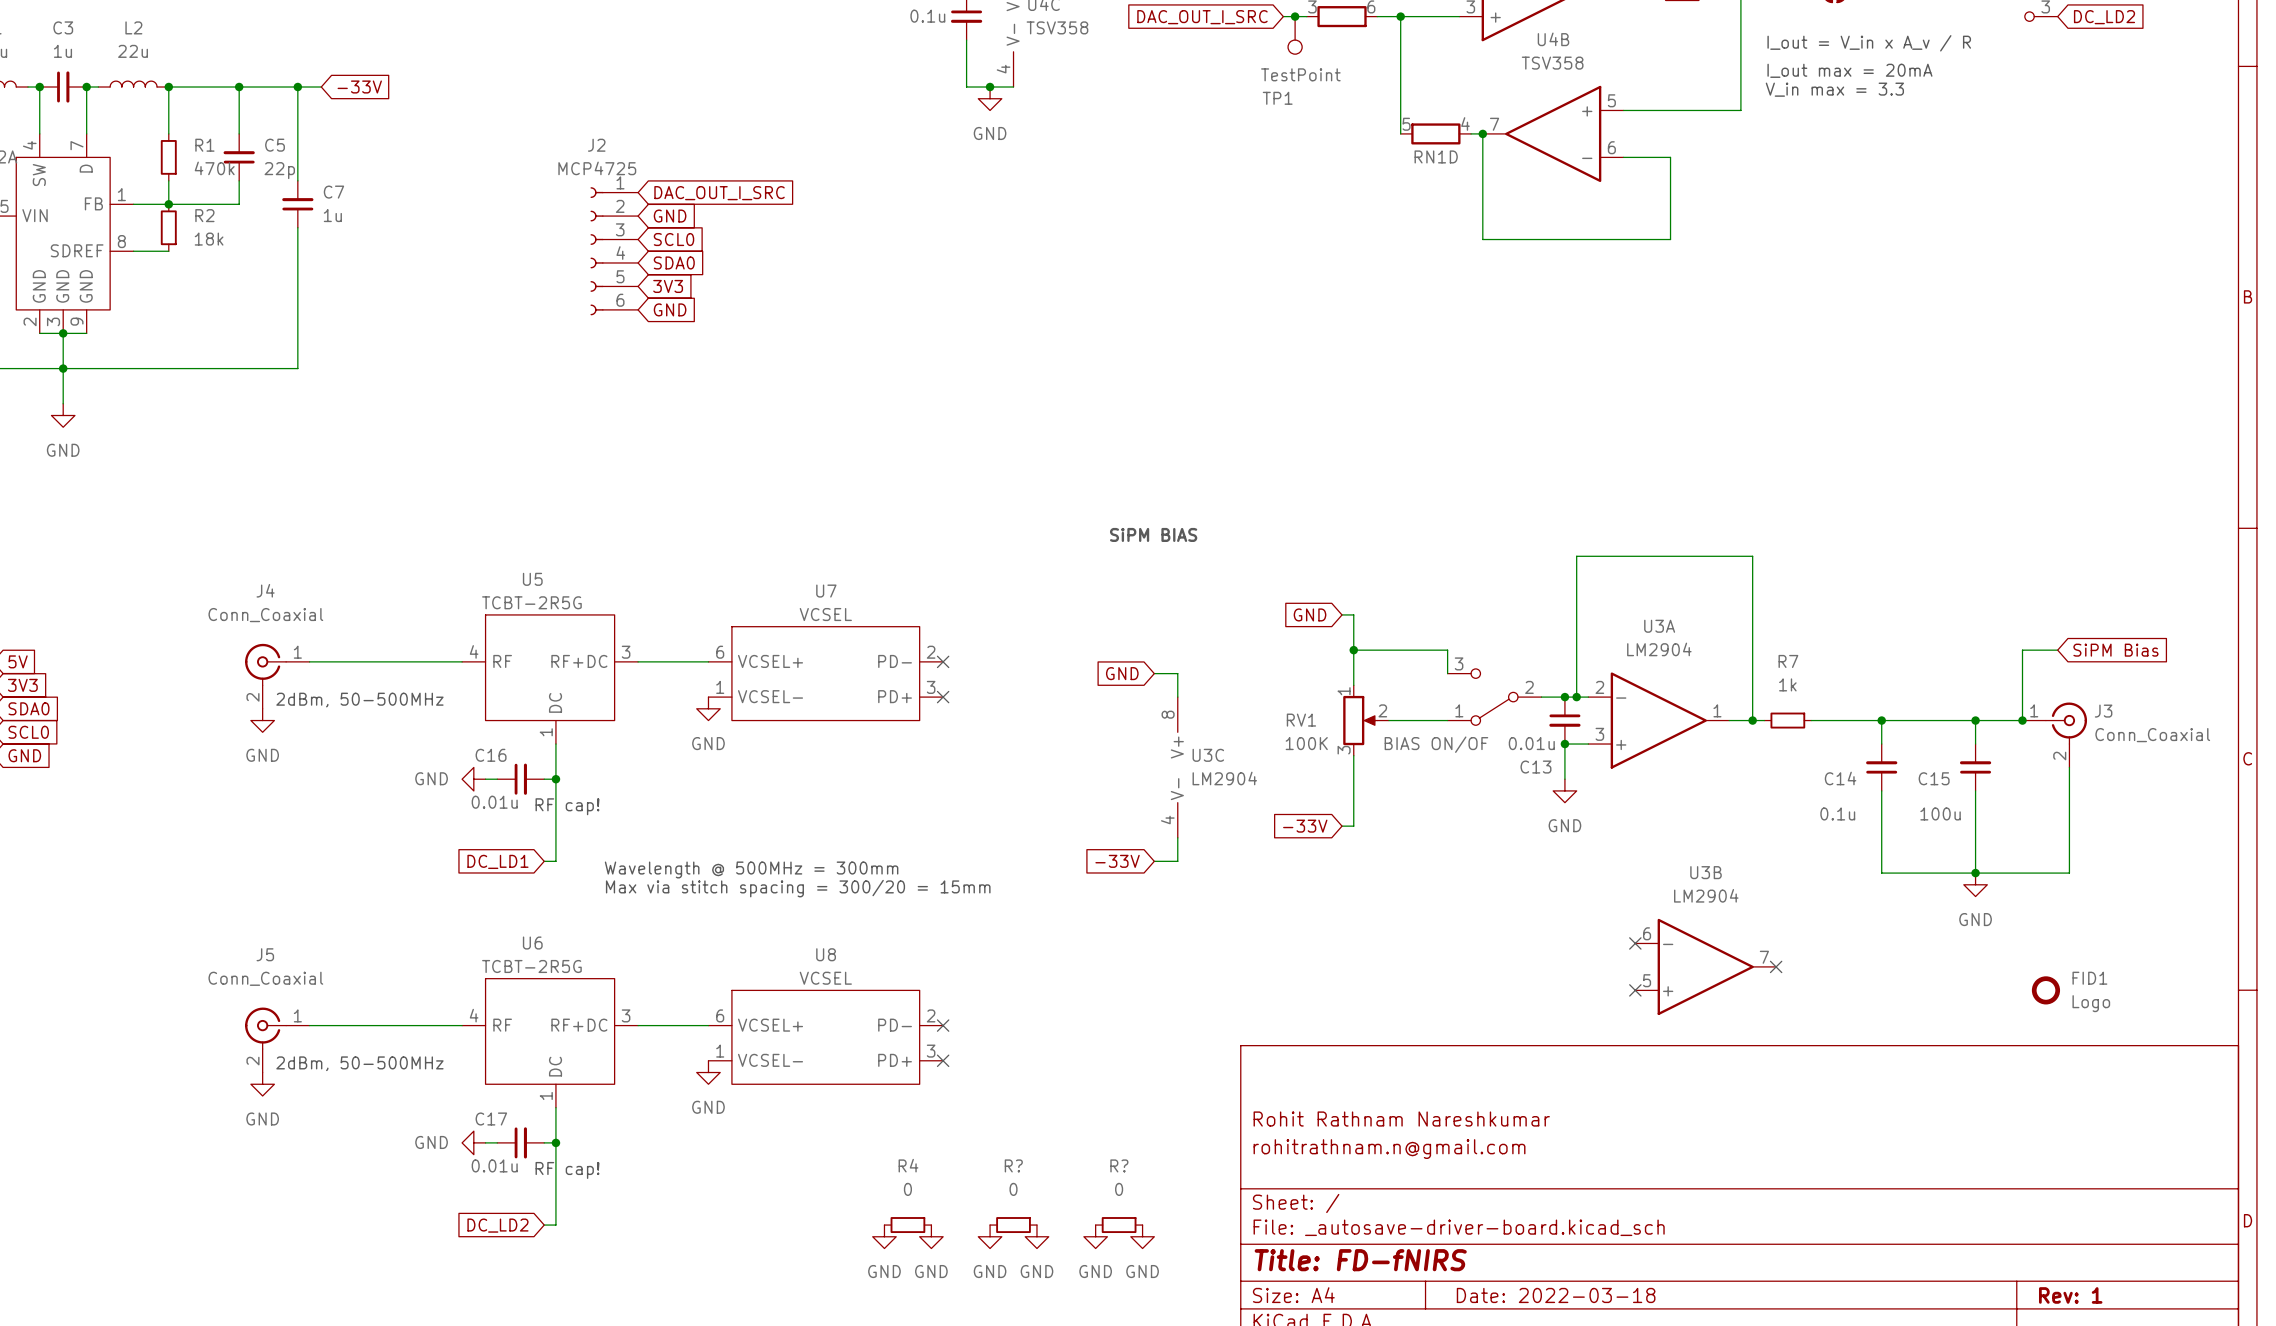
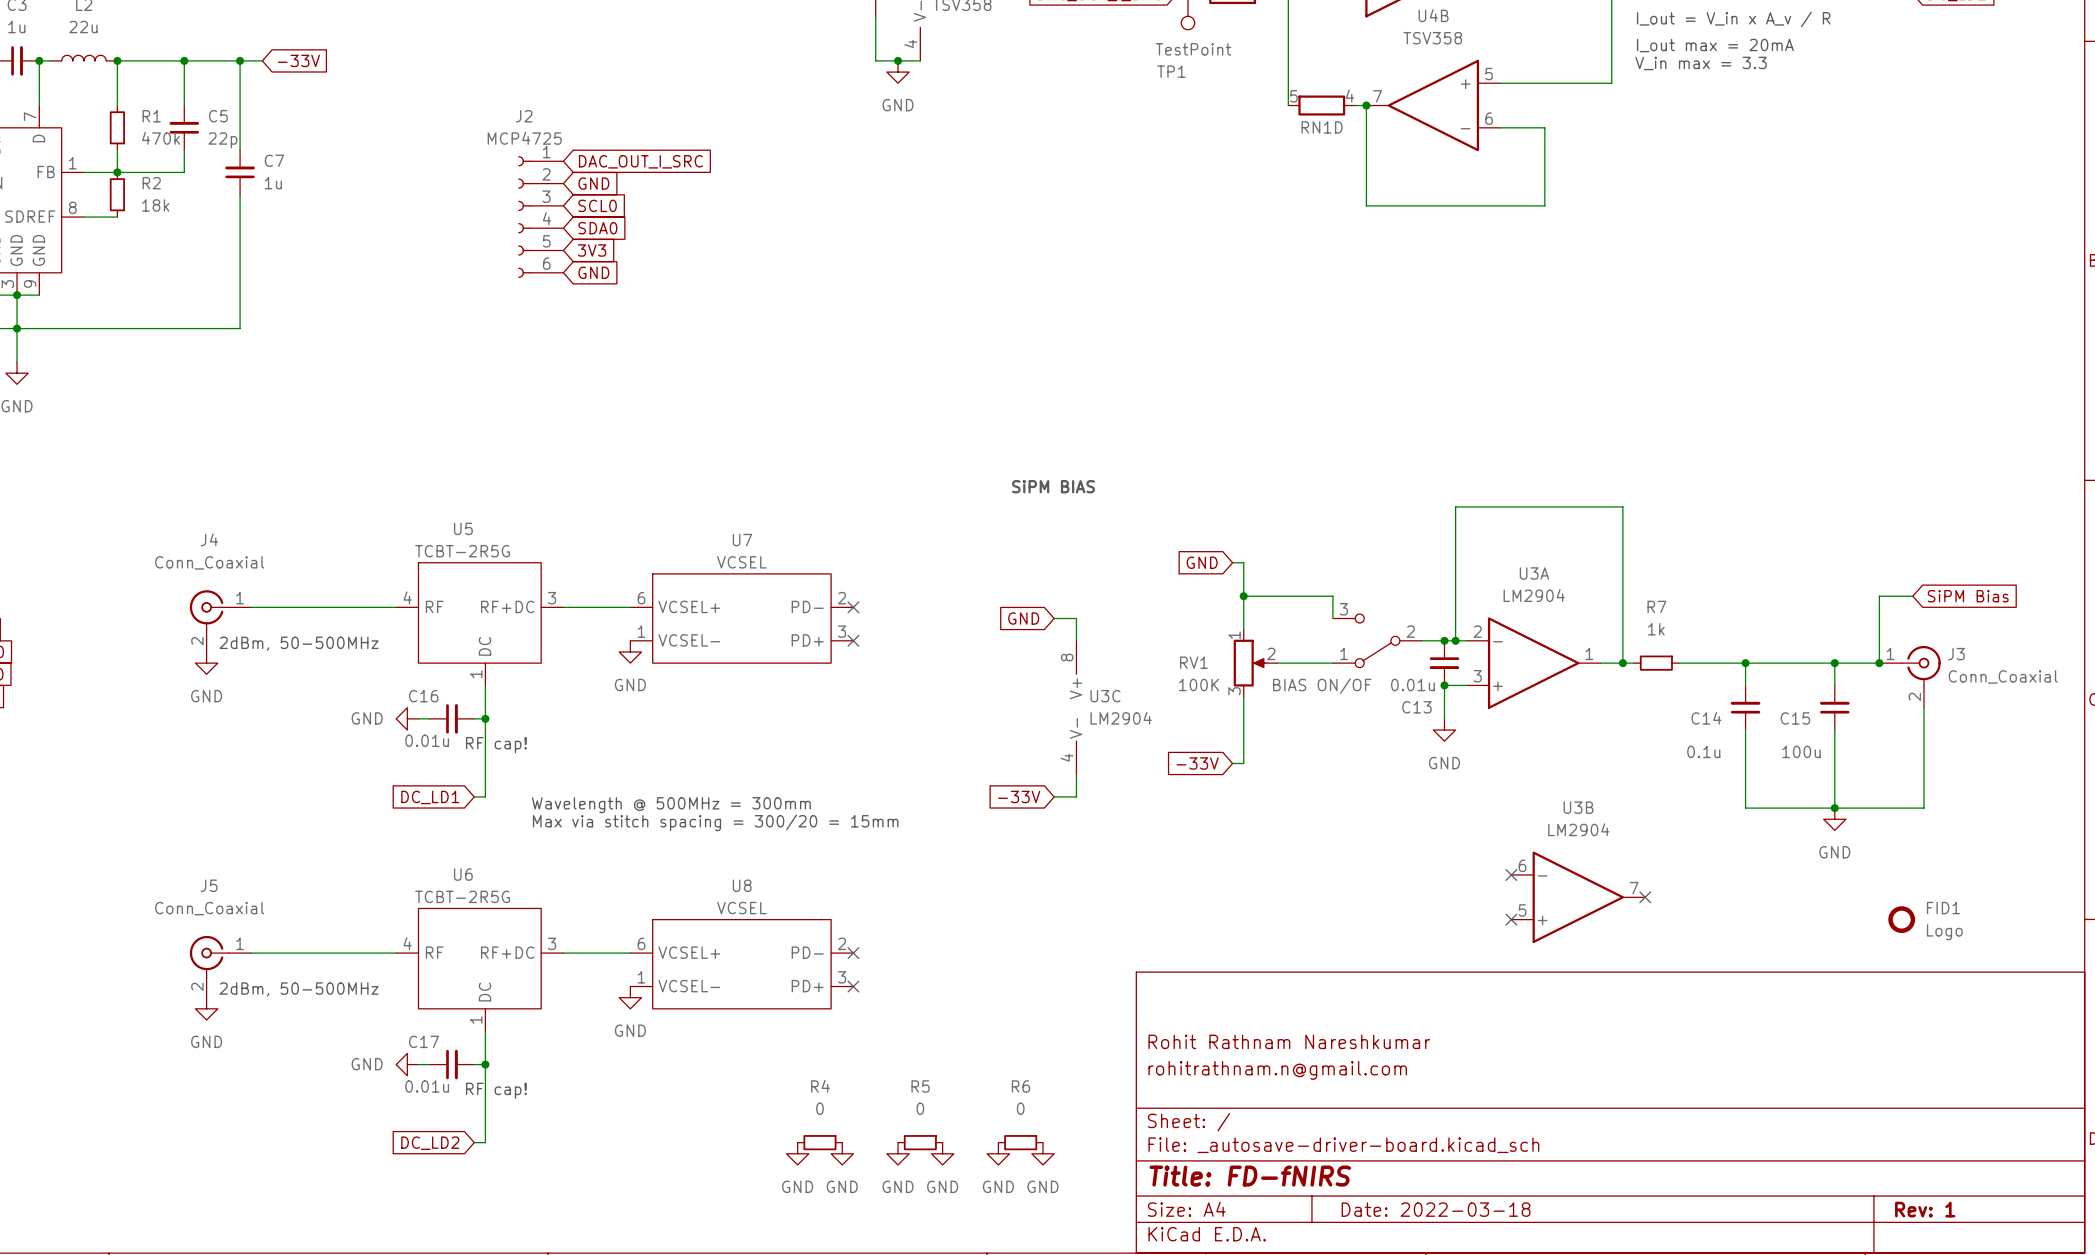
R? name: R? (1013, 1165) -> R5 (920, 1086)
R? name: R? (1119, 1165) -> R6 (1020, 1086)

